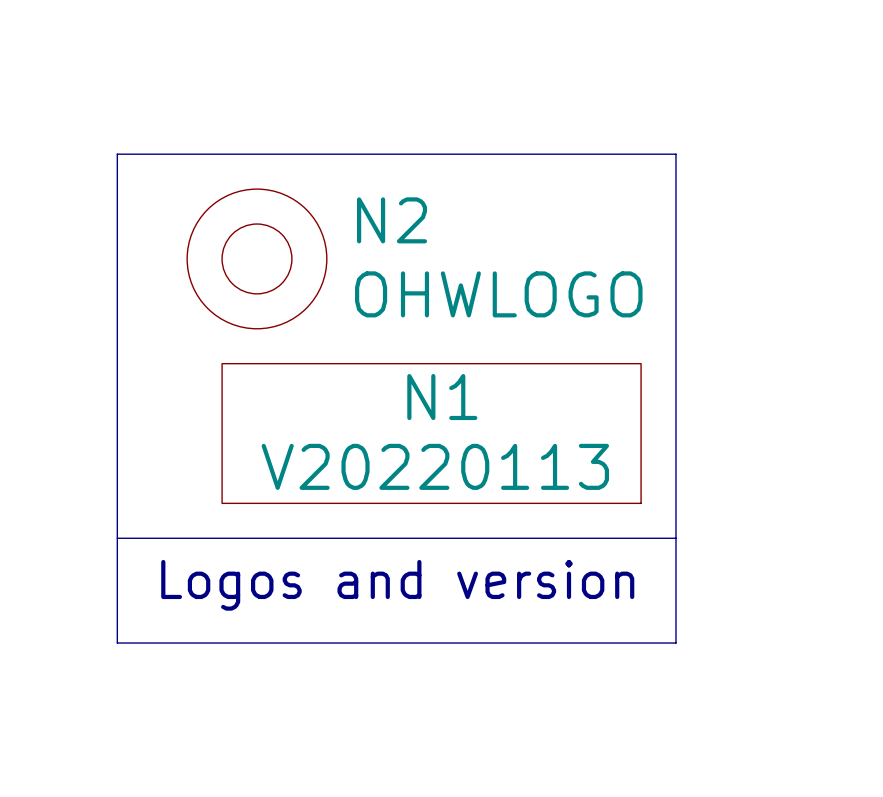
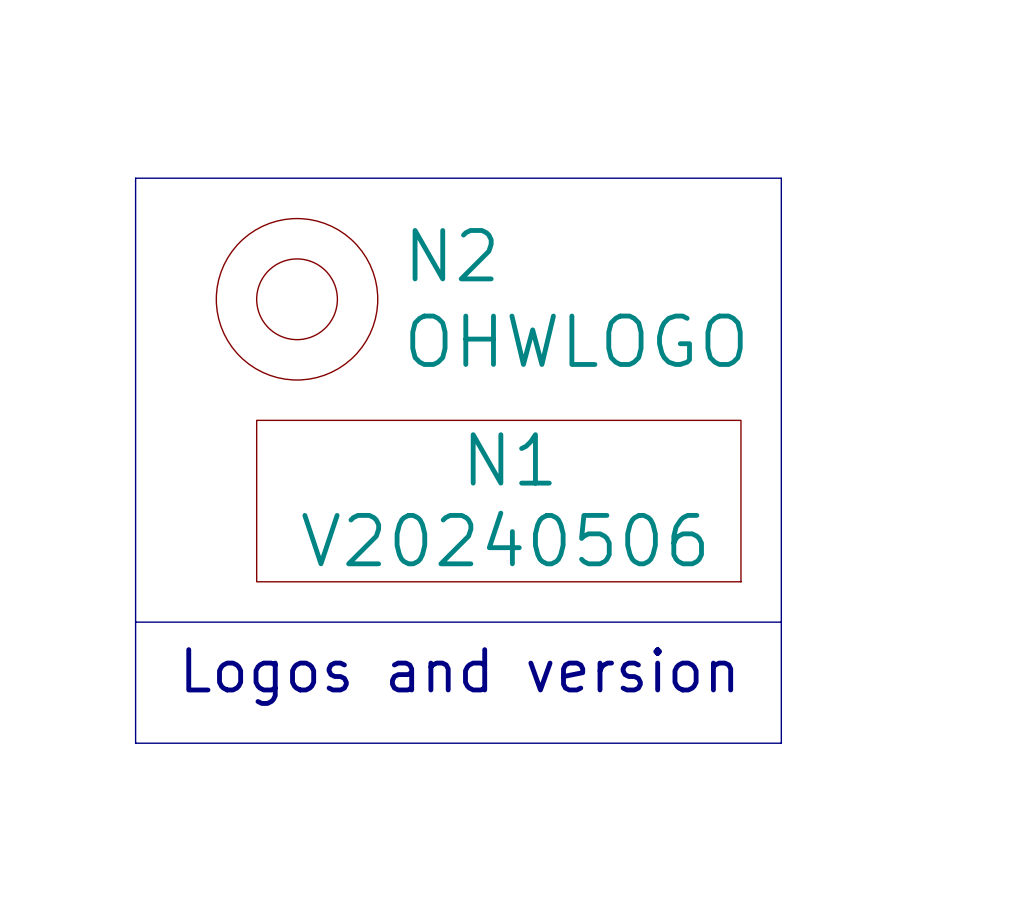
N1 value: V20220113 (435, 466) -> V20240506 (503, 538)

